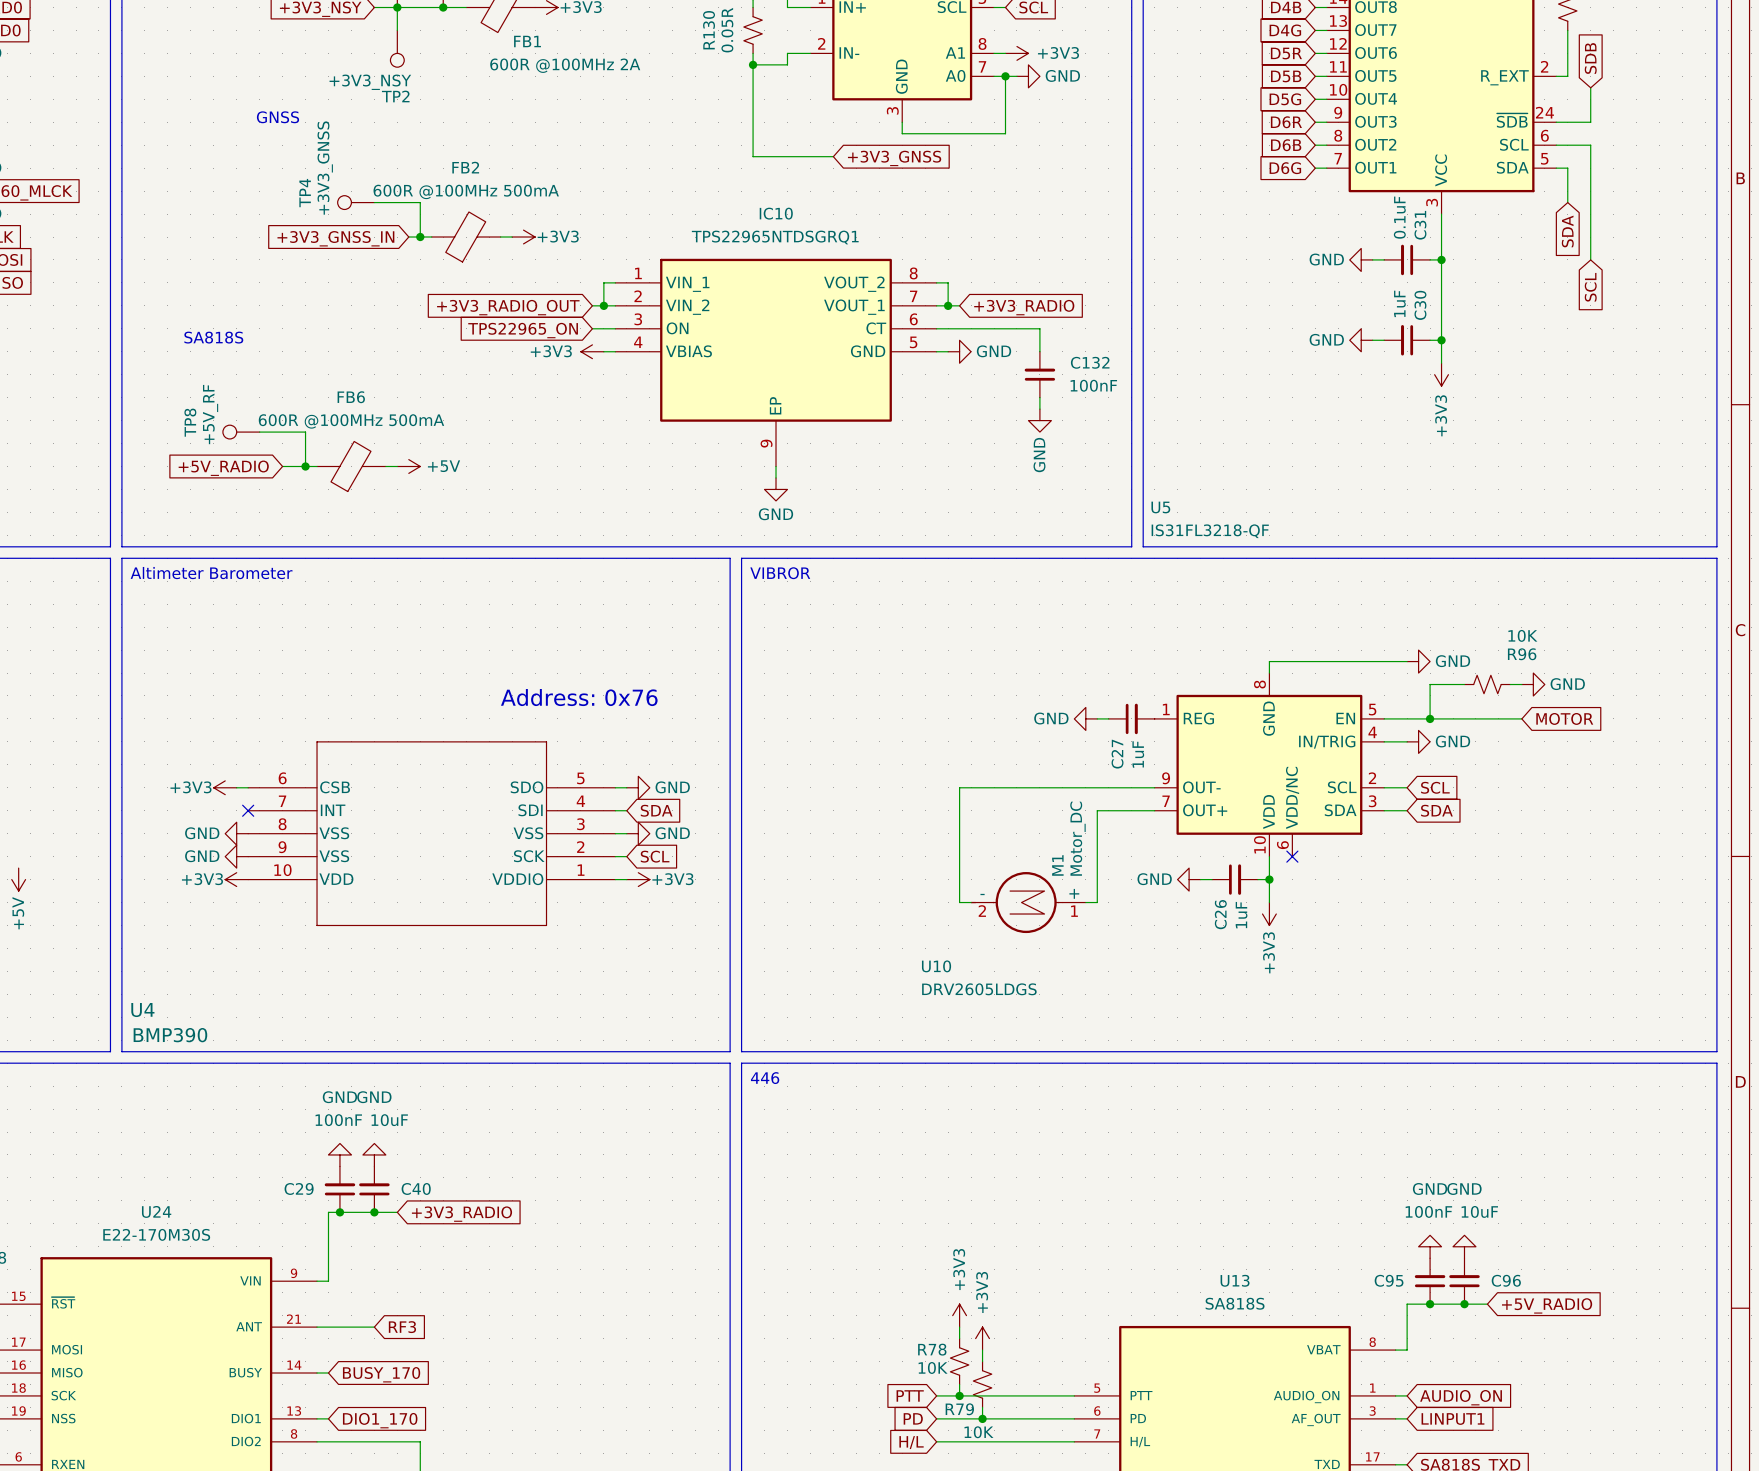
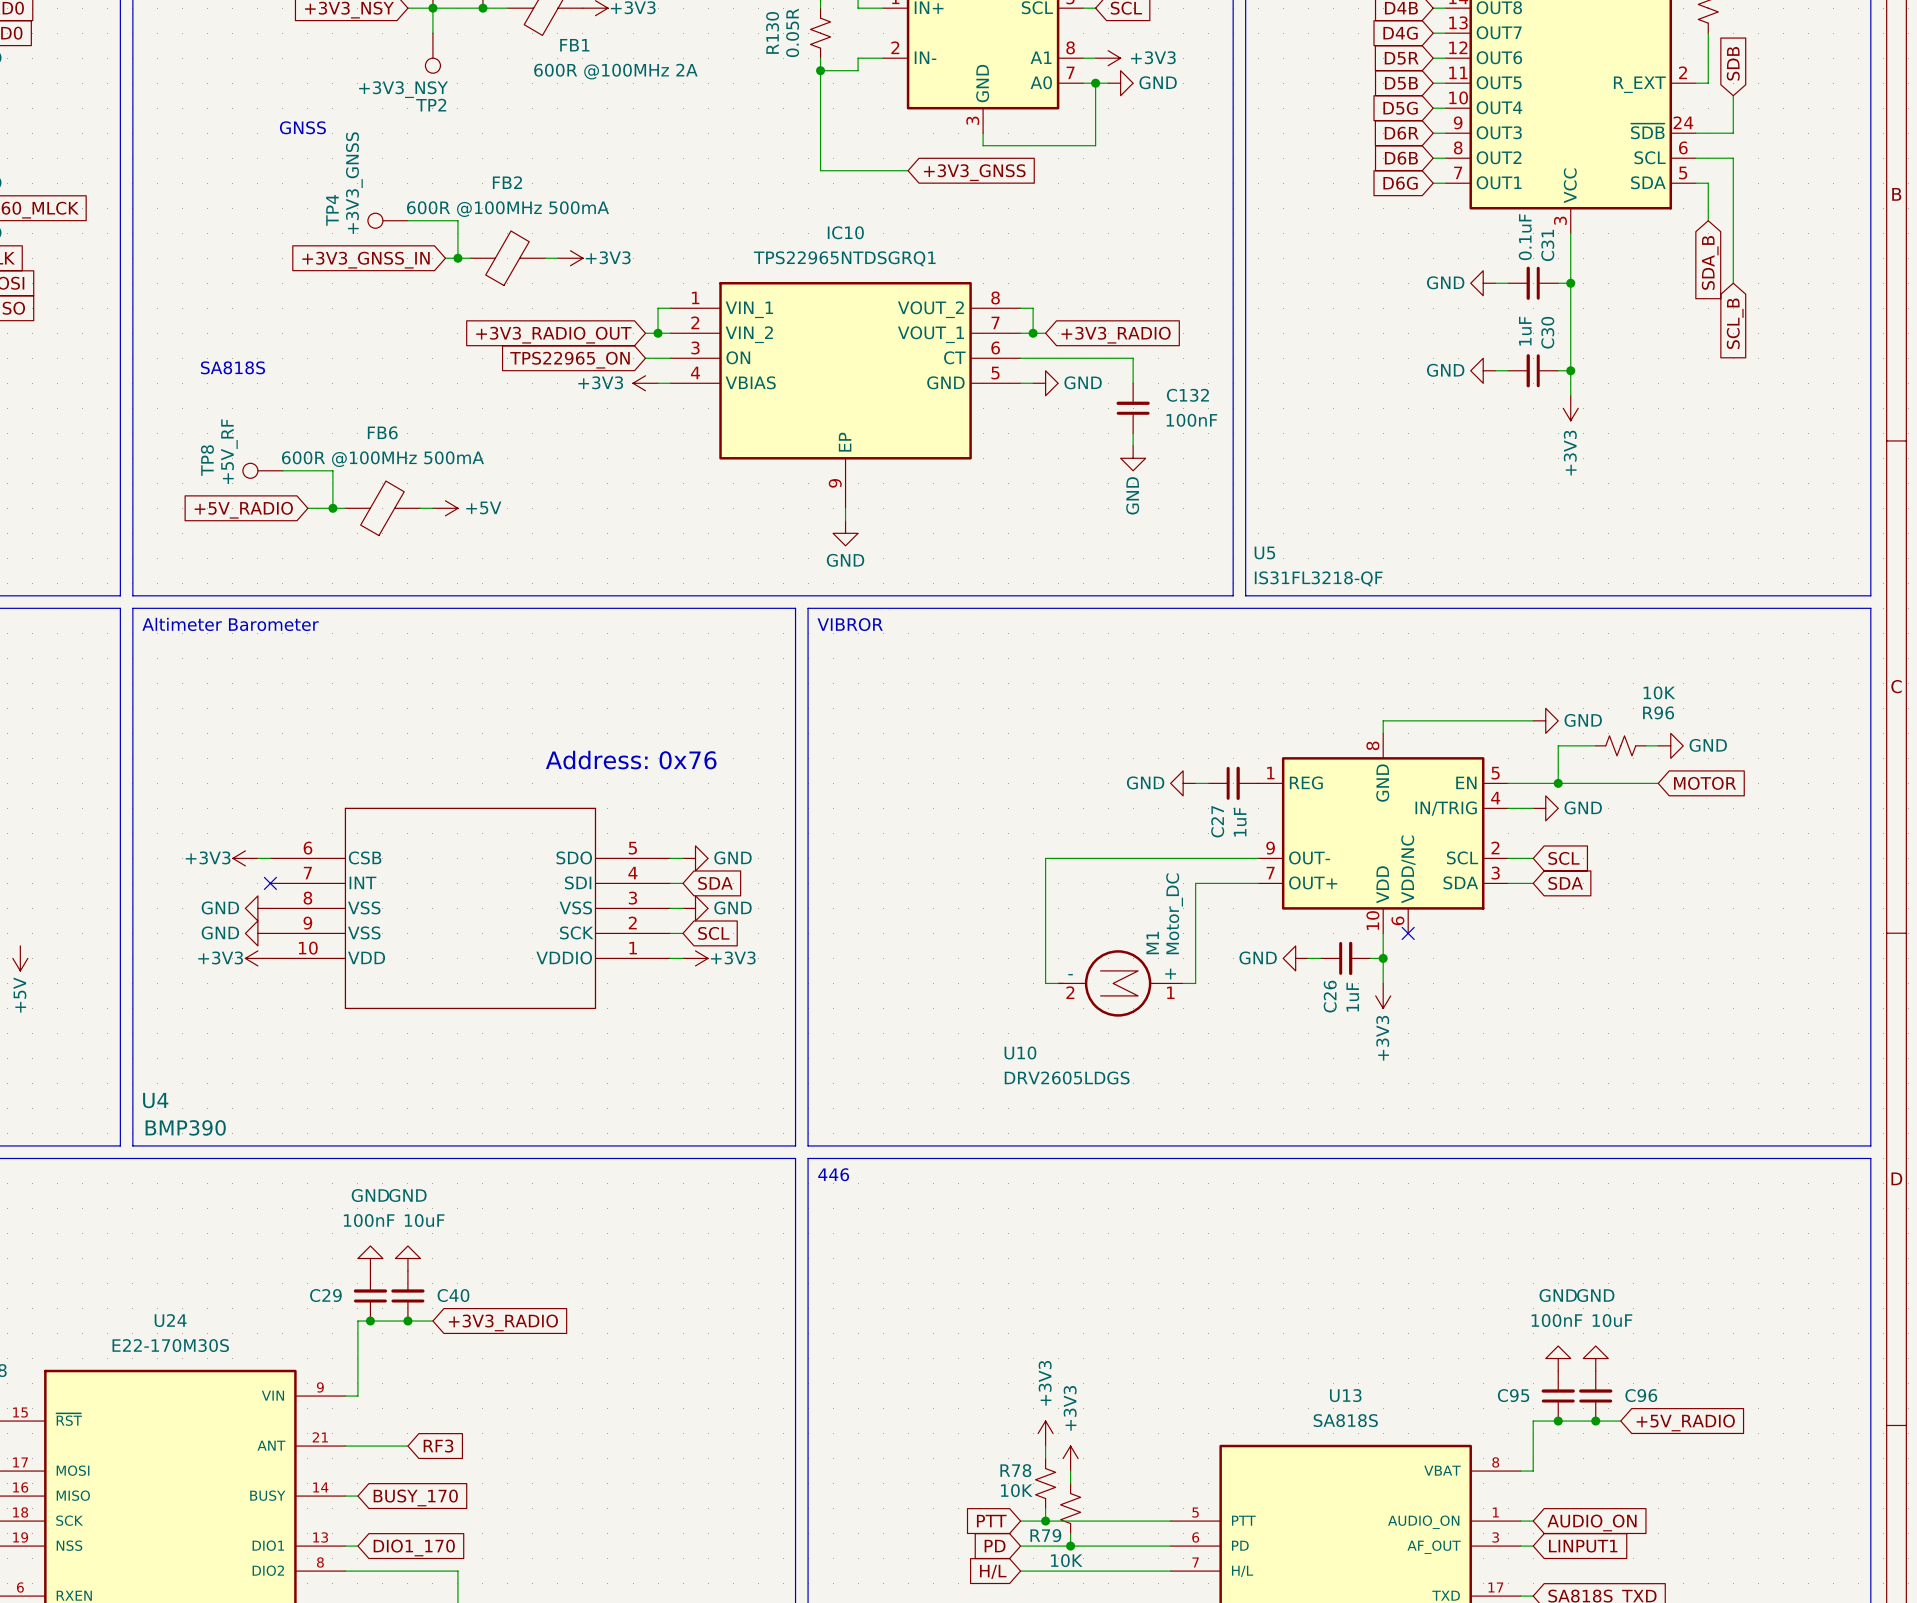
global label: SDA (1567, 231) -> SDA_B (1710, 262)
global label: SCL (1590, 287) -> SCL_B (1735, 323)

